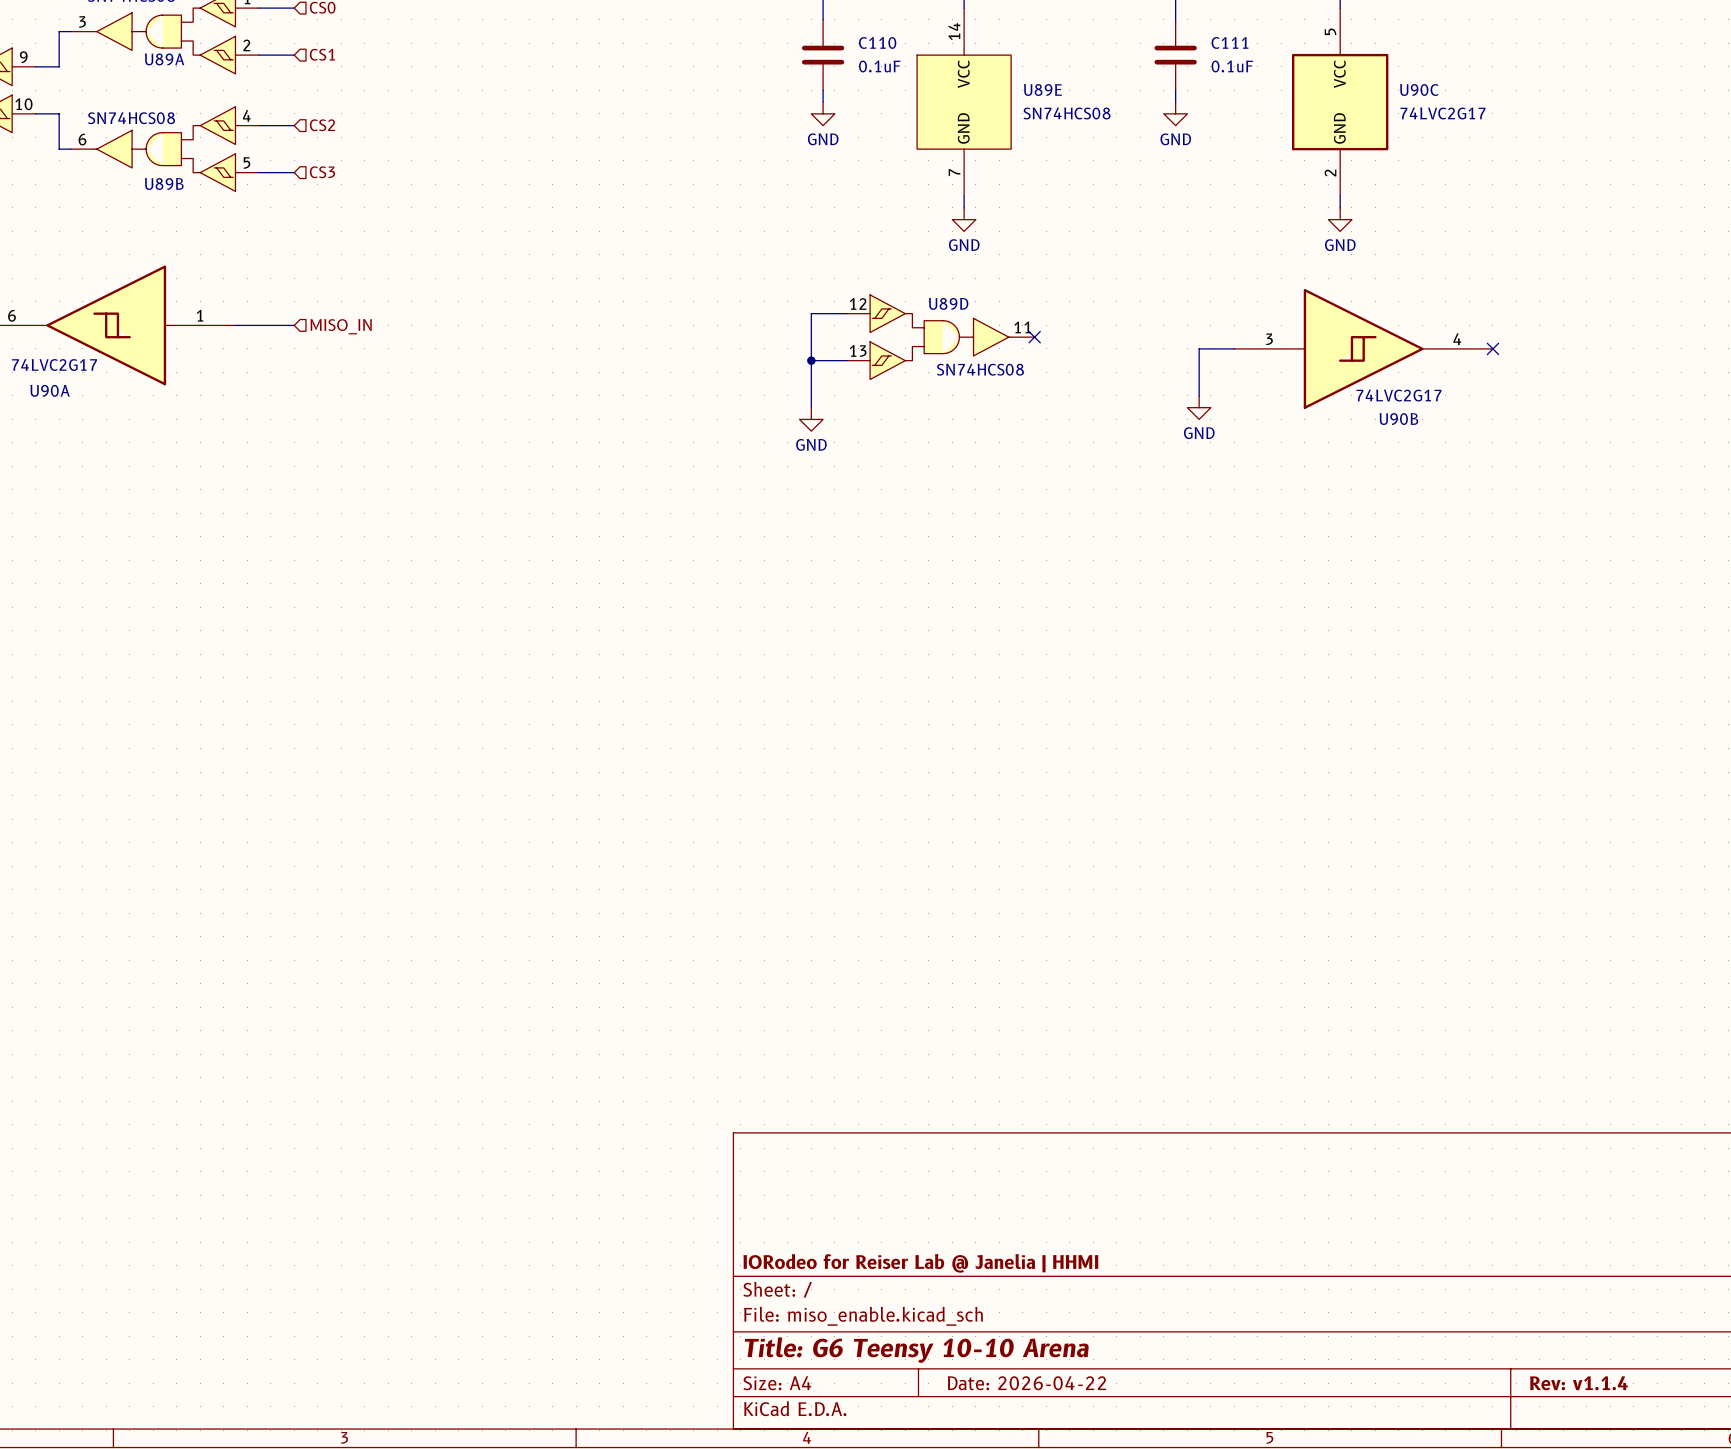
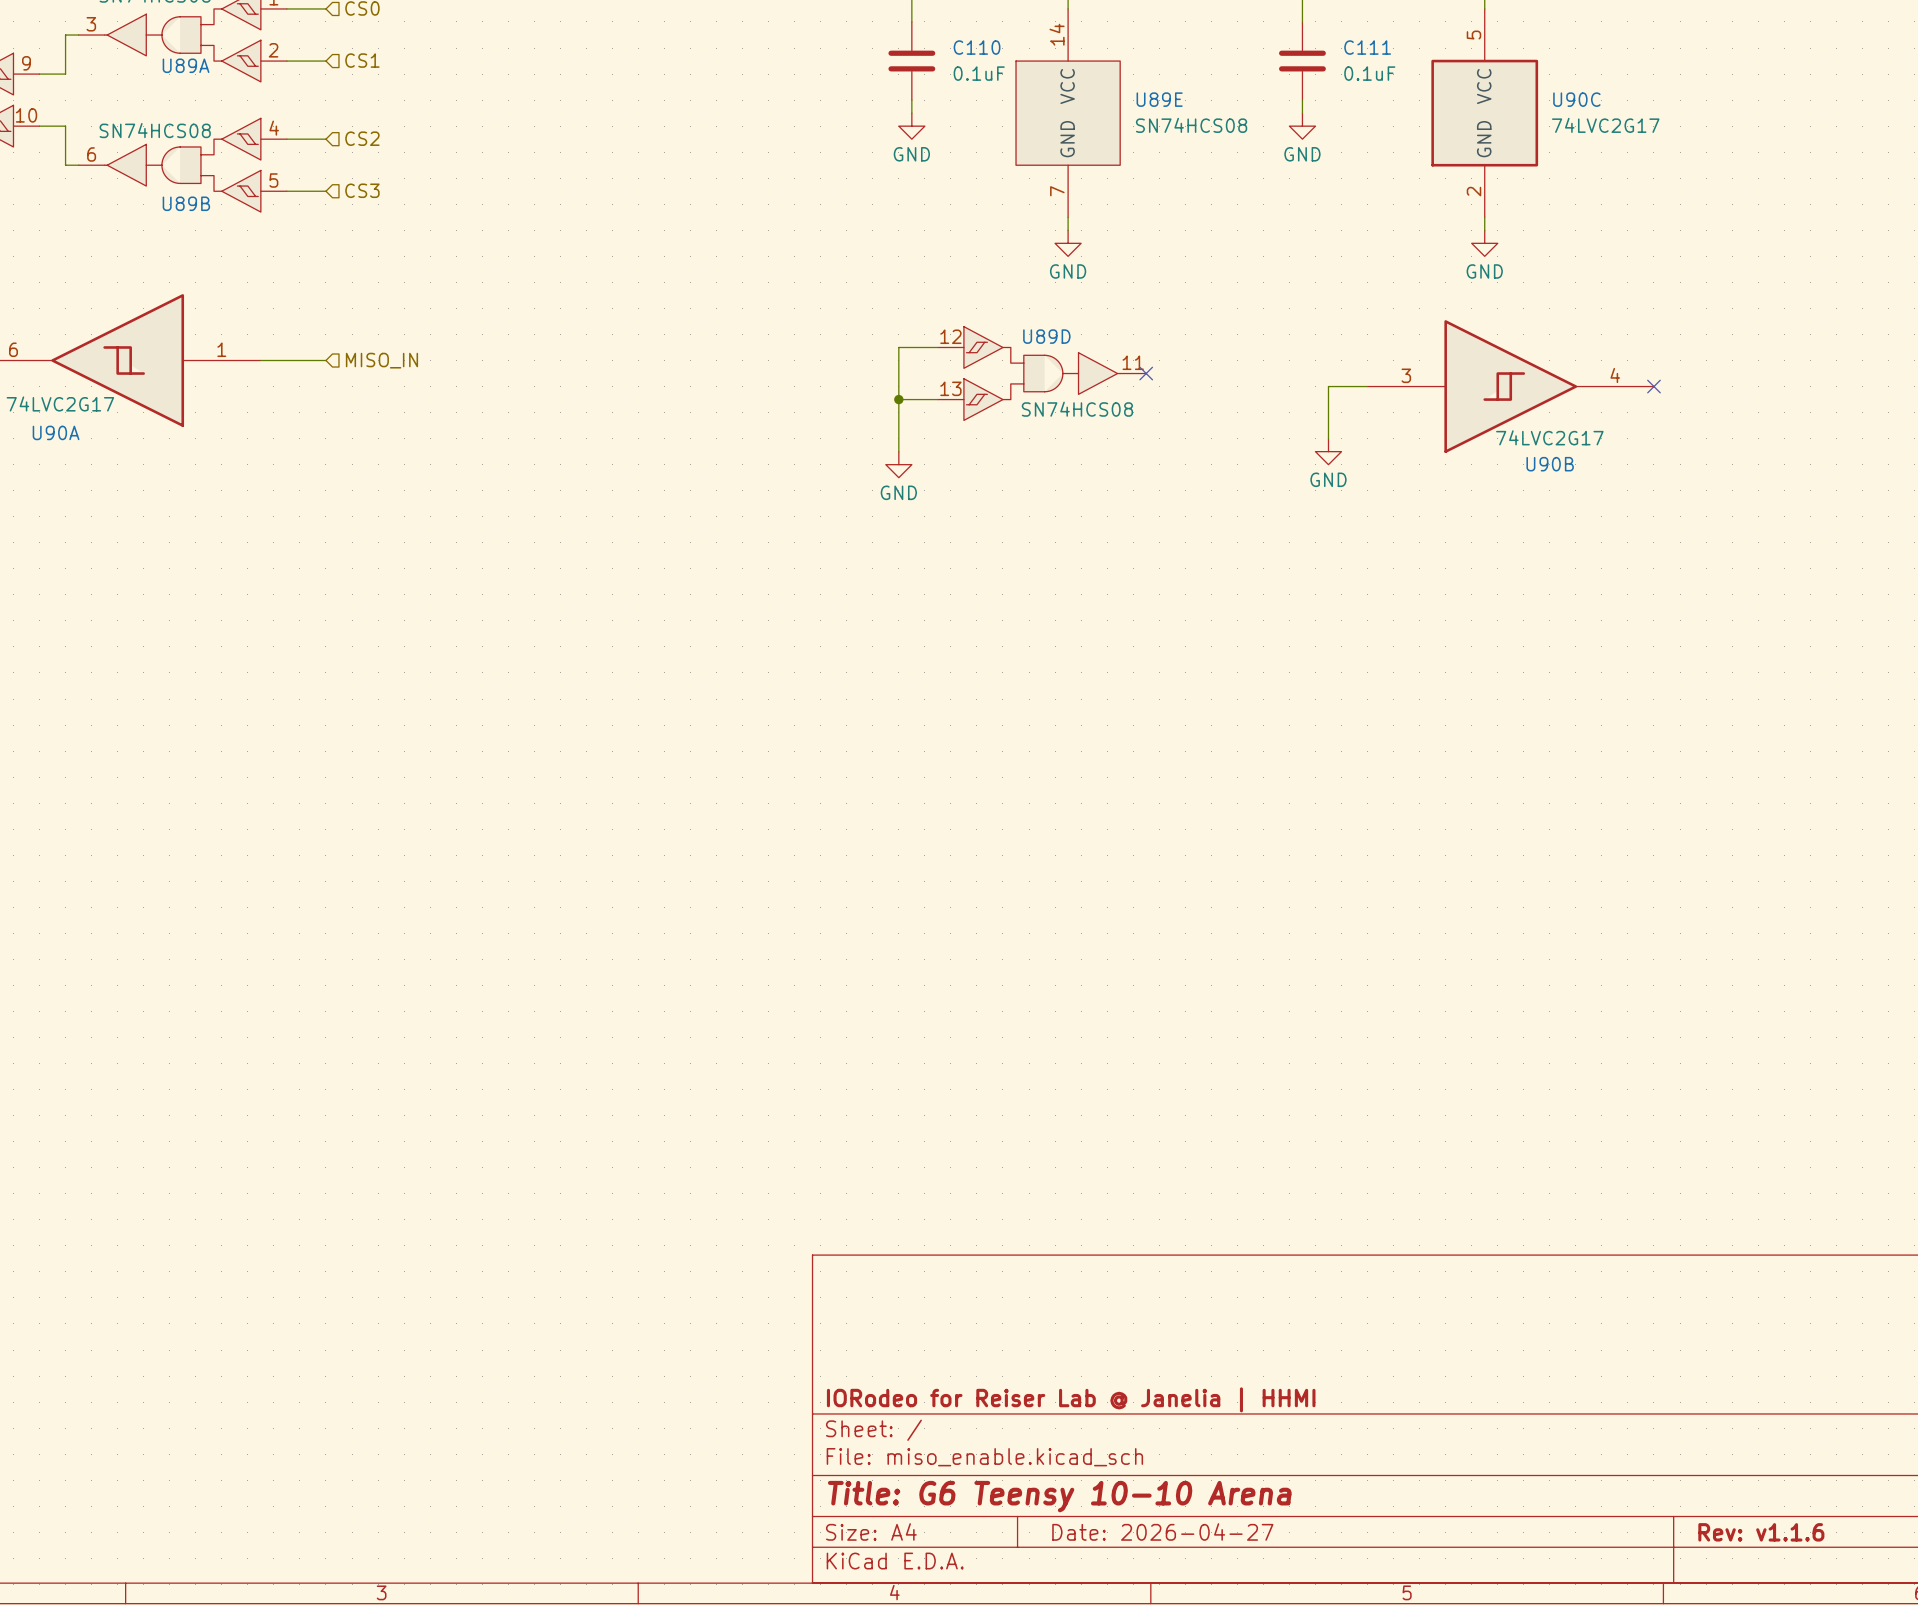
title block: Date: 2026-04-22 (1026, 1383) -> Date: 2026-04-27 (1162, 1531)
title block: Rev: v1.1.4 (1578, 1383) -> Rev: v1.1.6 (1761, 1532)

